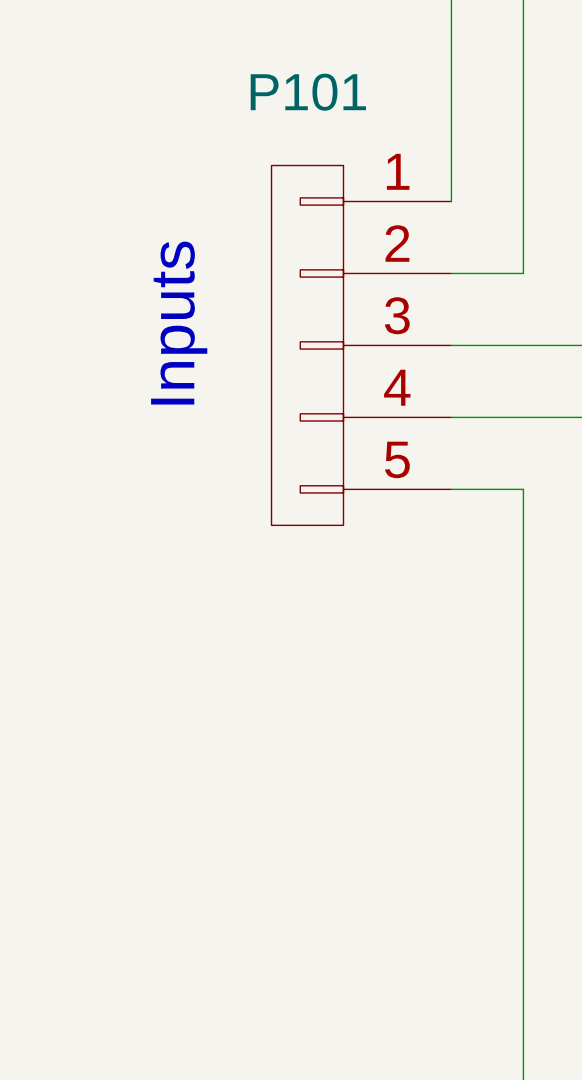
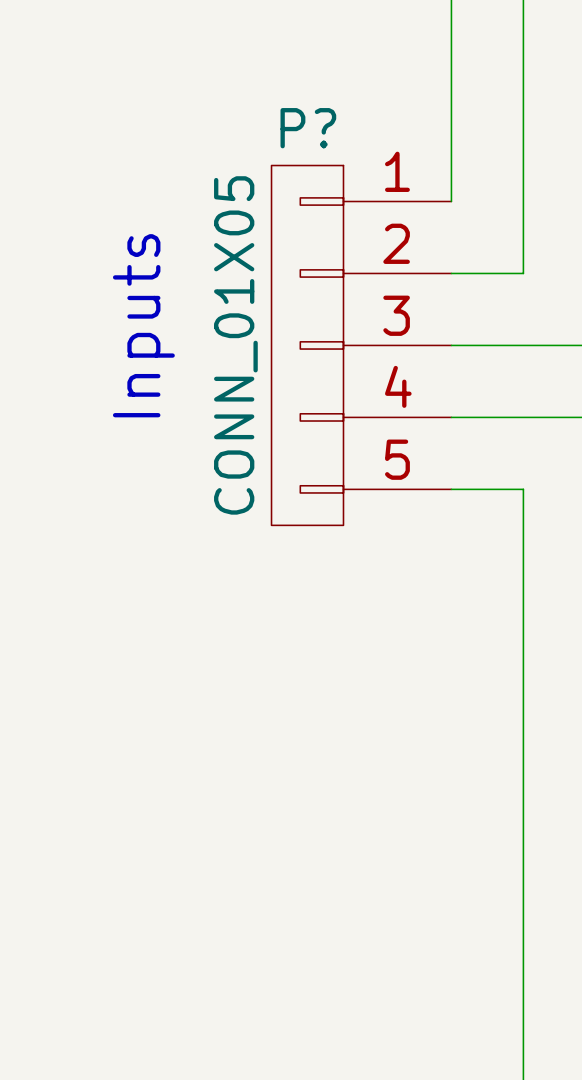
P101 name: P101 (308, 92) -> P? (308, 128)
text position: Inputs (179, 323) -> Inputs (143, 325)
P101 value: none -> CONN_01X05 (235, 345)

